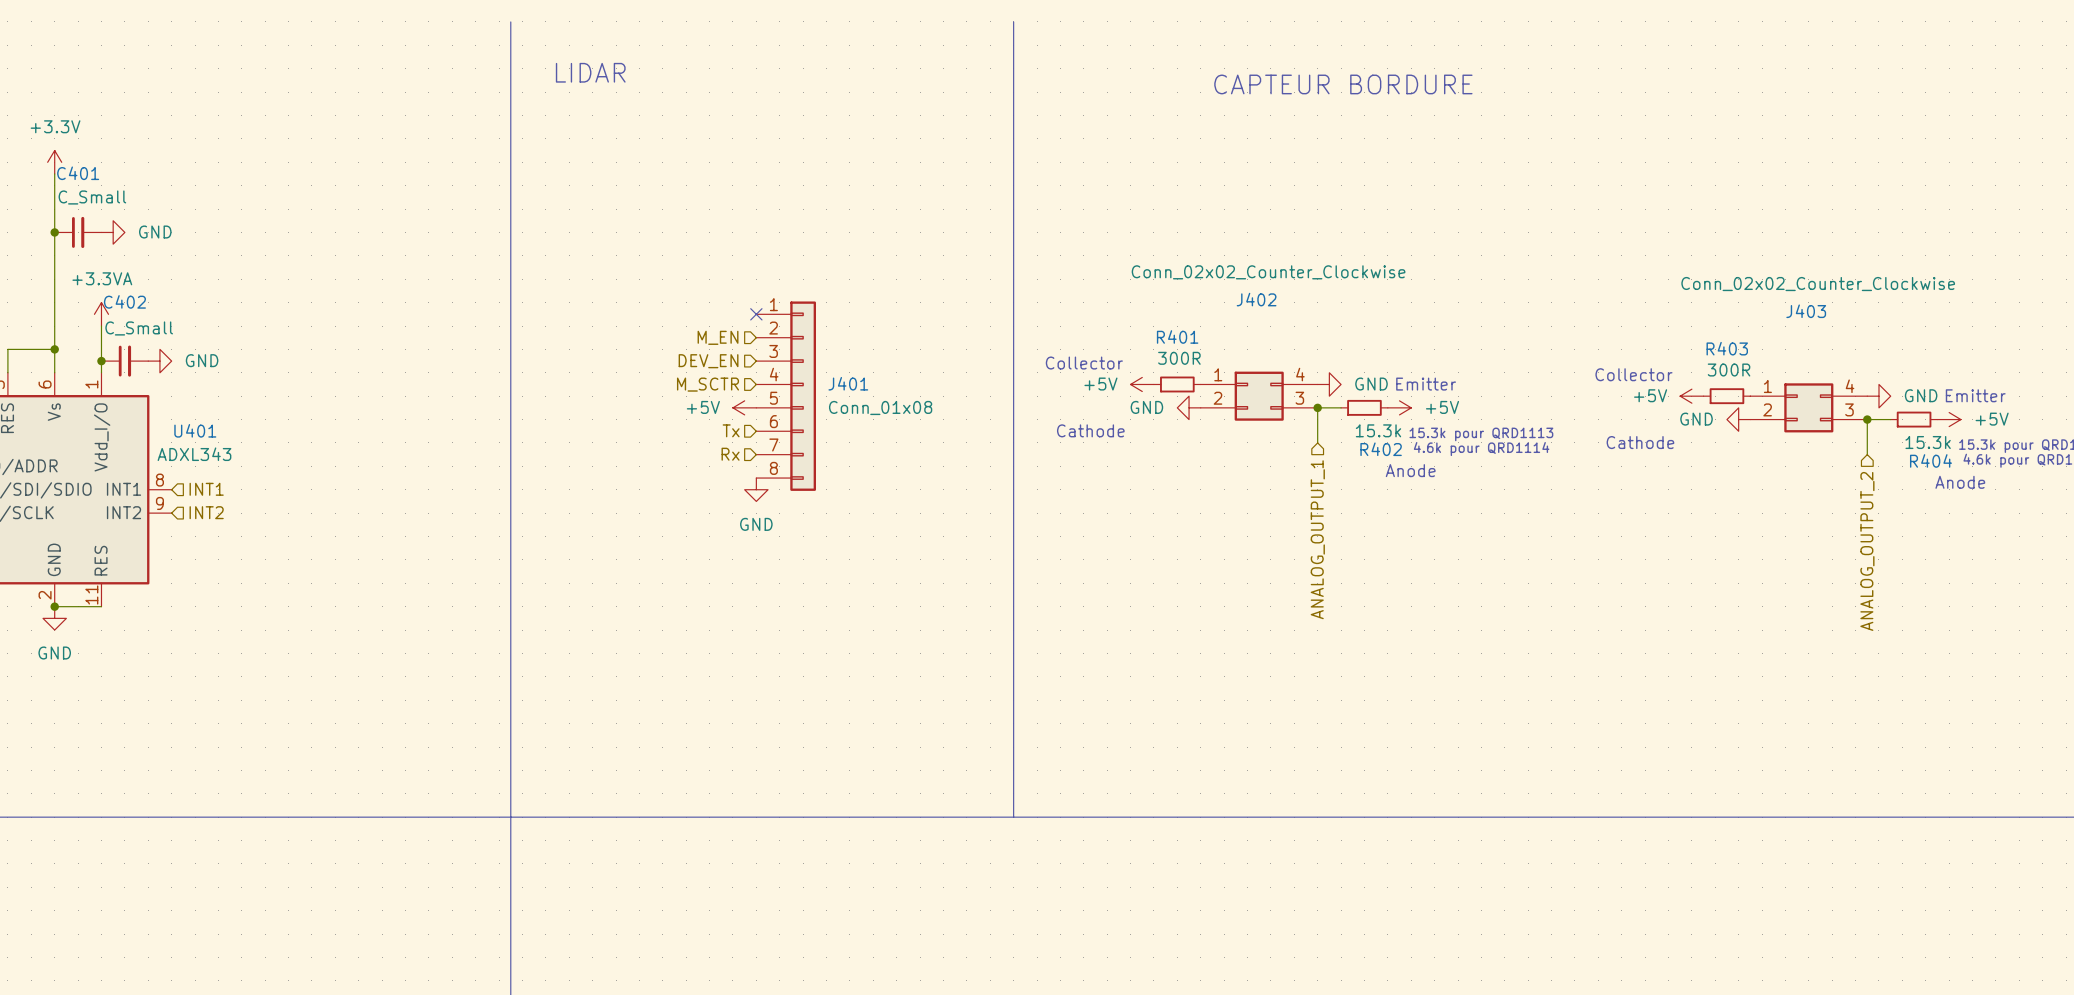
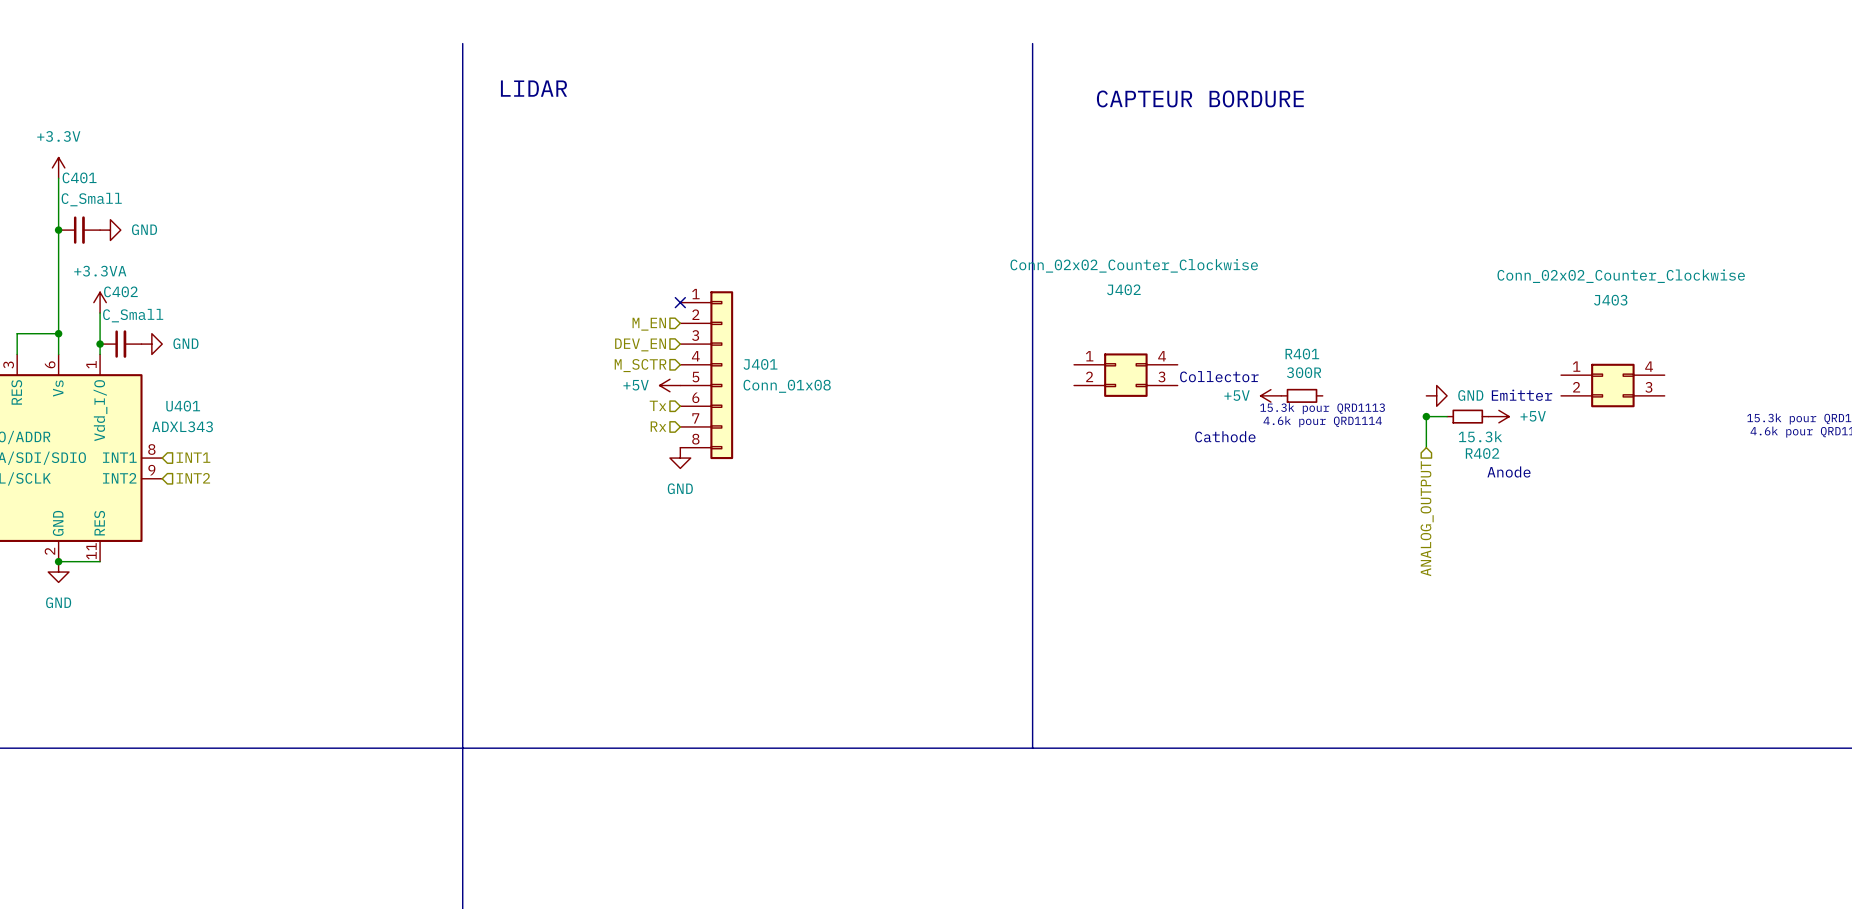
line: (1013, 21) (1013, 817) -> (1032, 43) (1032, 748)
text: Collector (1084, 363) -> none
text: Collector (1633, 374) -> none
power symbol: +5V (1142, 384) -> none
R401 position: (1177, 384) -> (1302, 395)
power symbol: GND (1329, 384) -> none
text: Emitter (1426, 384) -> none
text: Emitter (1975, 395) -> none
power symbol rotation: 0° (1691, 396) -> 180° (1498, 416)
power symbol position: +5V (1691, 396) -> +5V (1498, 416)
R403: 300R (1726, 396) -> none
power symbol: GND (1878, 396) -> none
text: none -> Collector (1219, 376)
power symbol: GND (1189, 407) -> none
junction: (1317, 407) -> none
wire: (1341, 407) (1317, 407) (1317, 442) -> none
R402 position: (1364, 407) -> (1467, 416)
power symbol rotation: 0° (1399, 407) -> 180° (1270, 395)
power symbol position: +5V (1399, 407) -> +5V (1270, 395)
text: none -> Emitter (1522, 395)
power symbol rotation: 0° (1738, 419) -> 180° (1436, 395)
power symbol position: GND (1738, 419) -> GND (1436, 395)
junction: (1867, 419) -> none
wire: (1890, 419) (1867, 419) (1867, 454) -> none
R404: 15.3k (1914, 419) -> none
power symbol: +5V (1949, 419) -> none
text: Cathode (1090, 430) -> none
junction: none -> (1426, 416)
wire: none -> (1447, 416) (1426, 416) (1426, 447)
text: Cathode (1640, 442) -> none
text: none -> Cathode (1225, 436)
text: Anode (1410, 470) -> none
text: Anode (1960, 482) -> none
text: none -> Anode (1508, 471)
hierarchical label: ANALOG_OUTPUT_1 (1317, 539) -> none
hierarchical label: ANALOG_OUTPUT_2 (1867, 551) -> none
hierarchical label: none -> ANALOG_OUTPUT (1427, 518)

